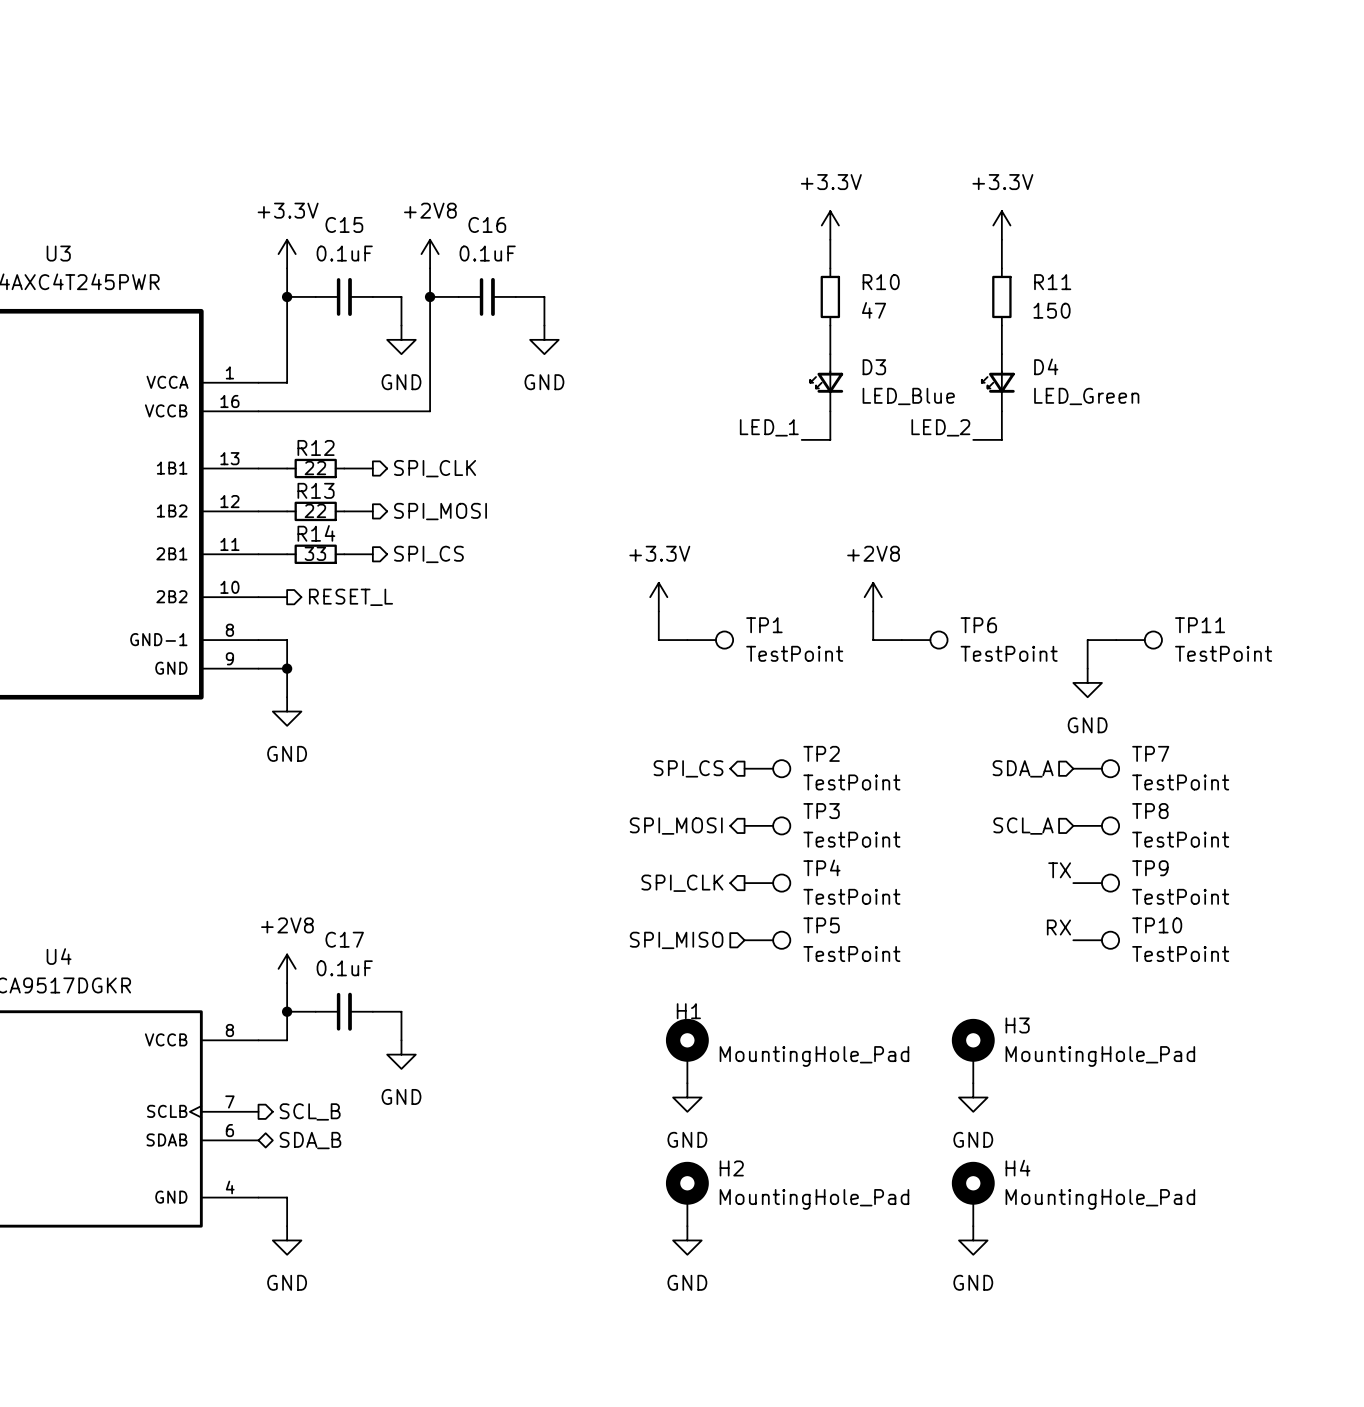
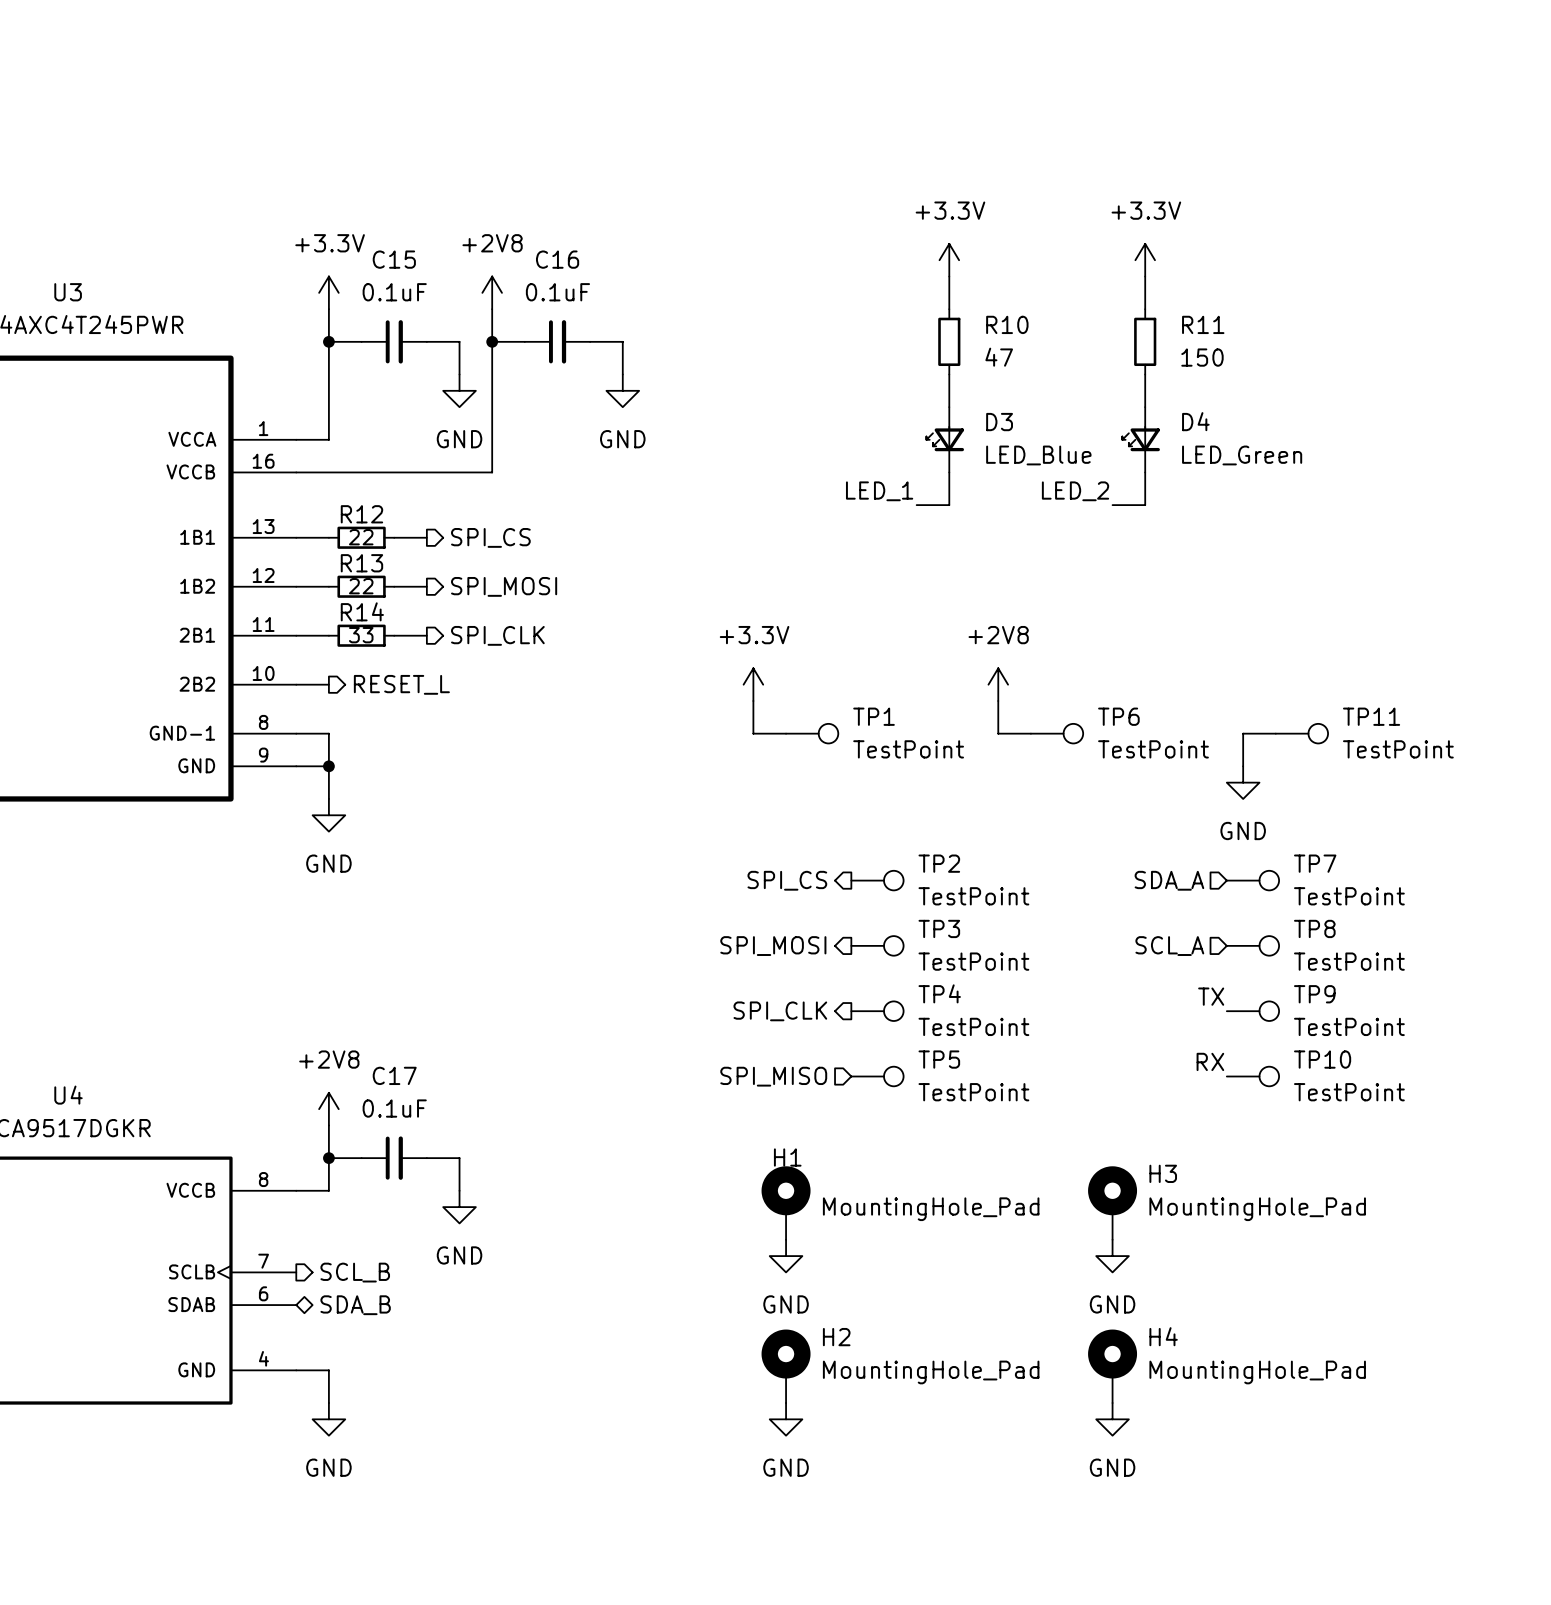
hierarchical label: SPI_CLK (435, 468) -> SPI_CS (490, 537)
hierarchical label: SPI_CS (428, 554) -> SPI_CLK (497, 635)

